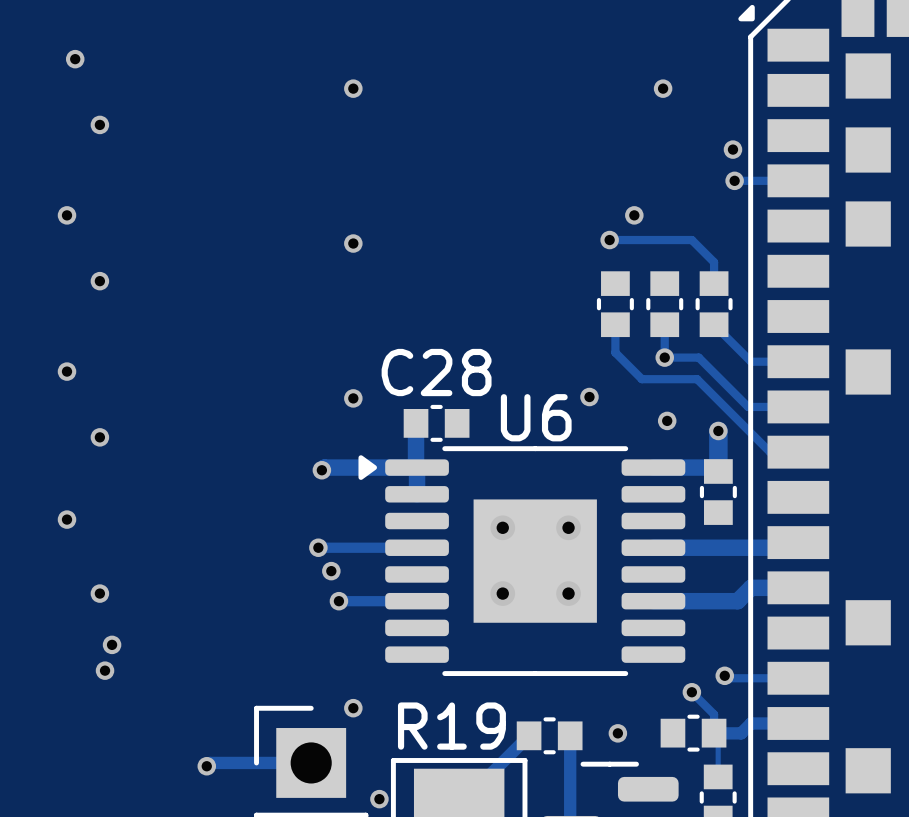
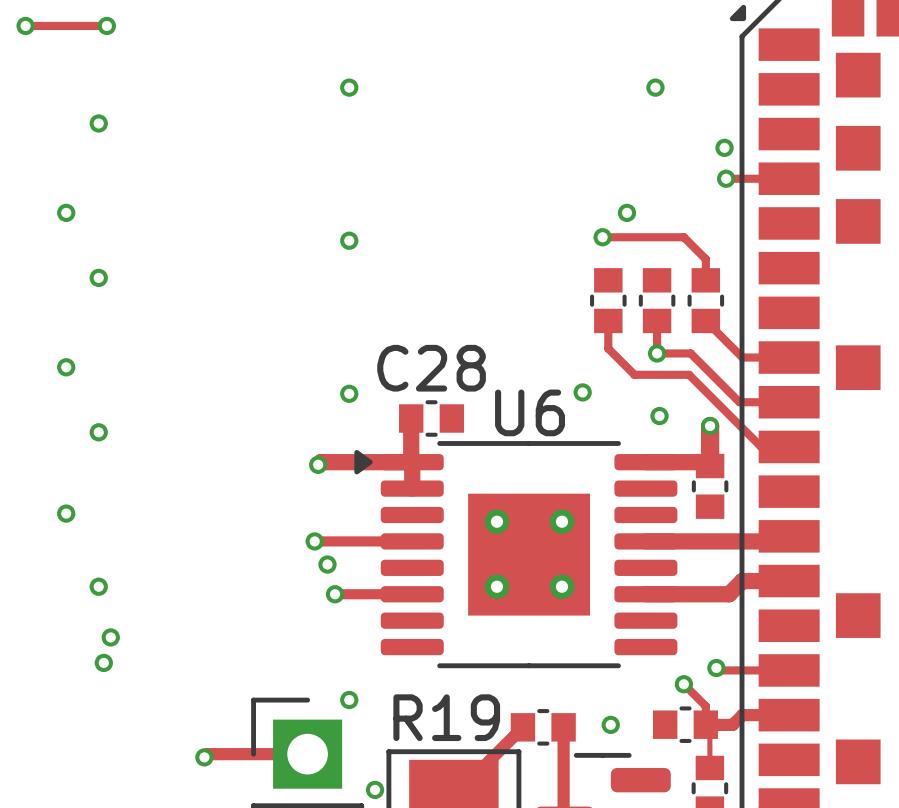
track: none -> (25, 25) (106, 25)
via: none -> (25, 25)
via: none -> (106, 25)
via: (75, 59) -> none

